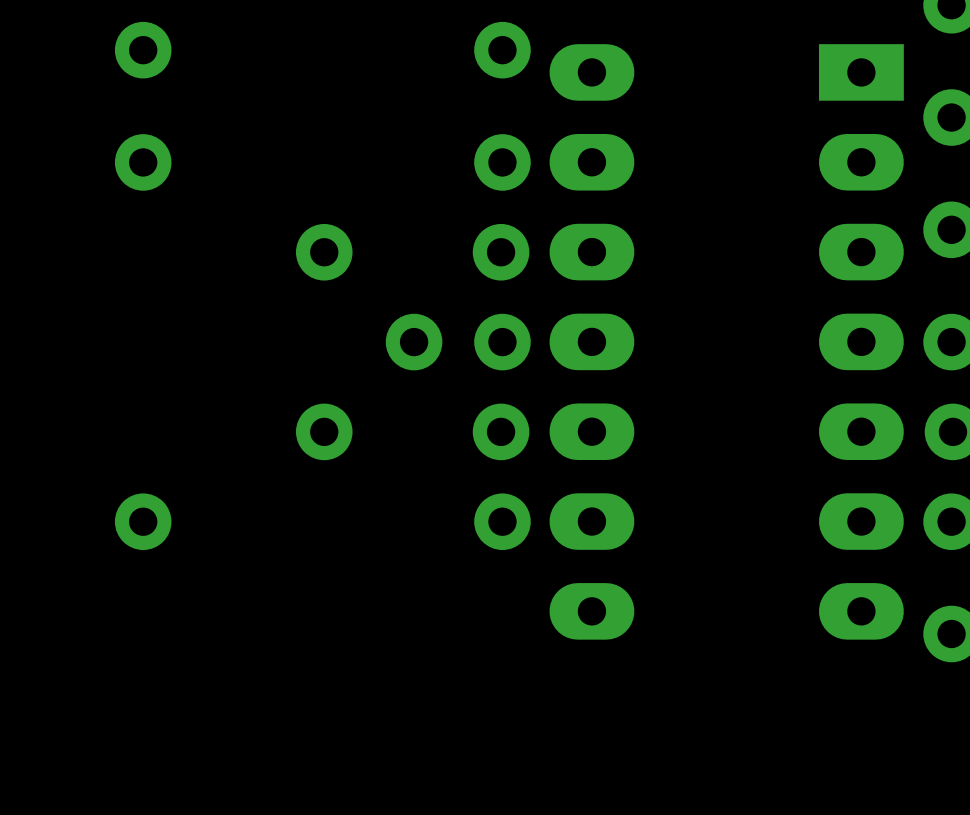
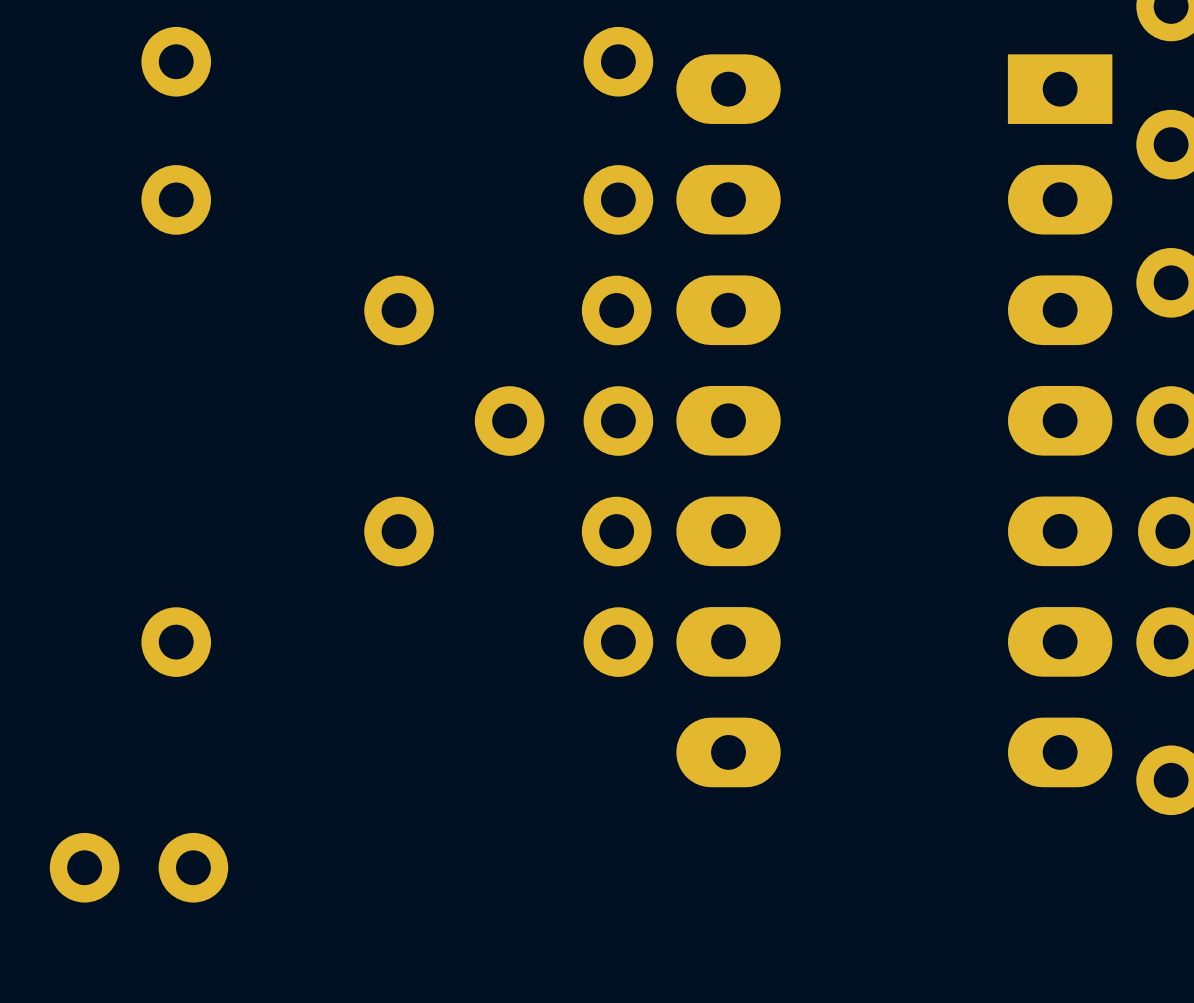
part: none -> (139, 867)

